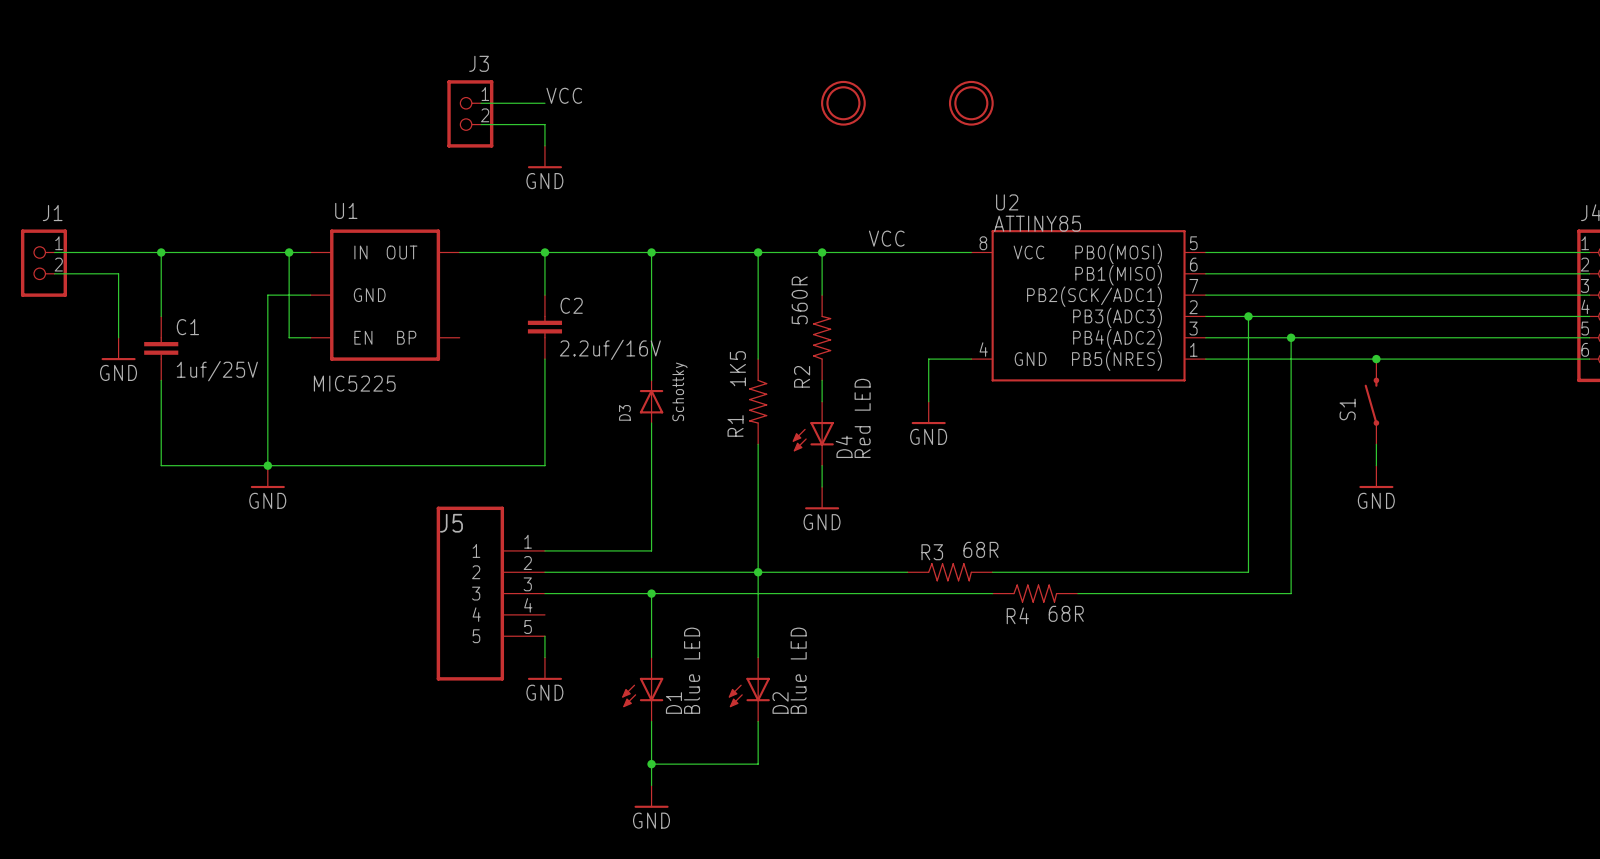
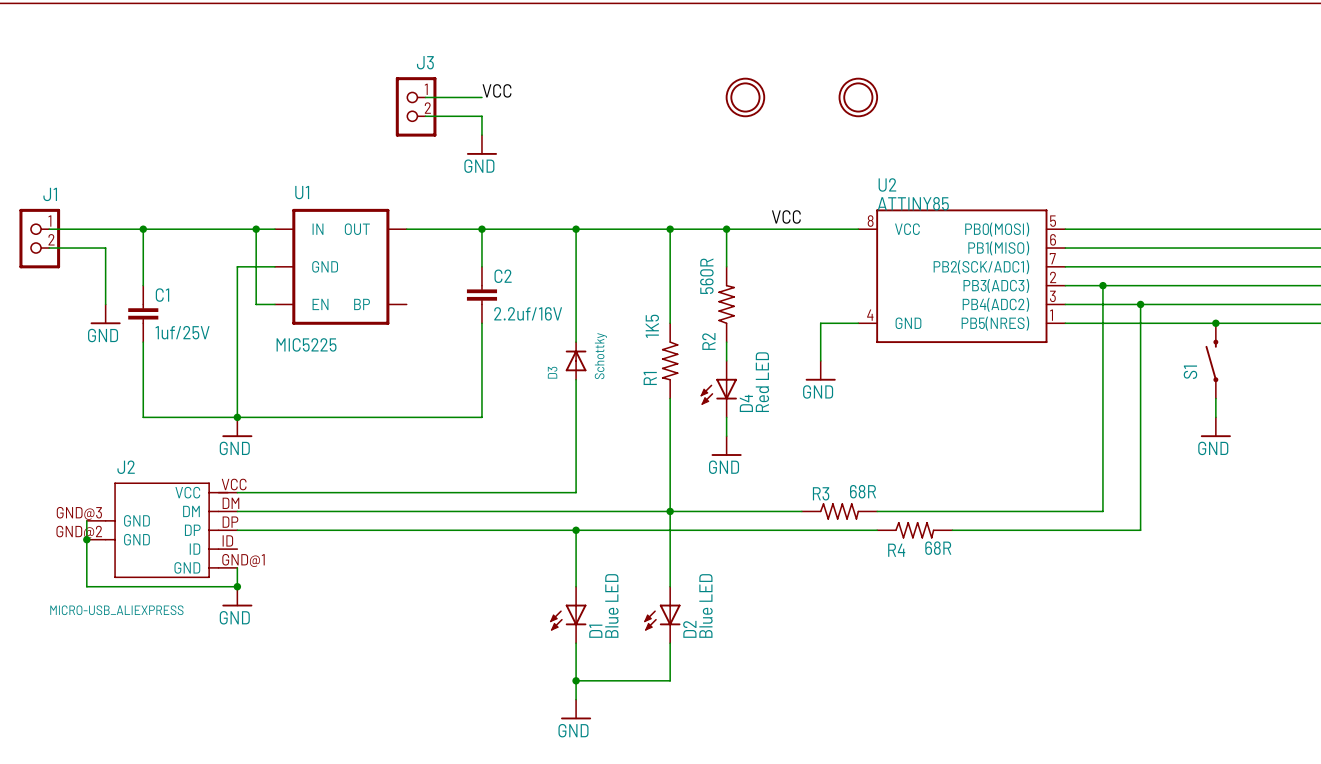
wire: none -> (237, 492) (481, 492)
wire: none -> (237, 511) (481, 511)
wire: none -> (86, 520) (86, 586) (237, 586) (237, 567)
J2: none -> MICRO-USB_ALIEXPRESS (162, 530)
wire: none -> (237, 530) (481, 530)
J5: (490, 593) -> none
junction: none -> (86, 539)
wire: (544, 636) (544, 657) -> none
junction: none -> (237, 586)
power symbol: none -> GND (237, 596)
power symbol: GND (544, 668) -> none

